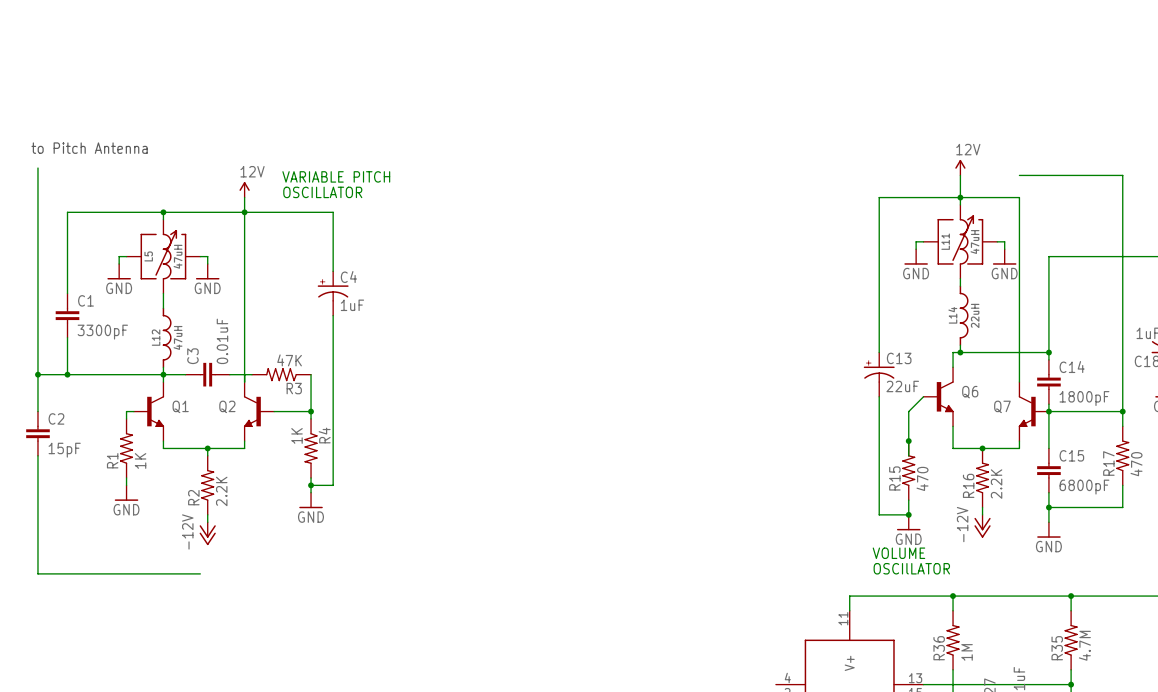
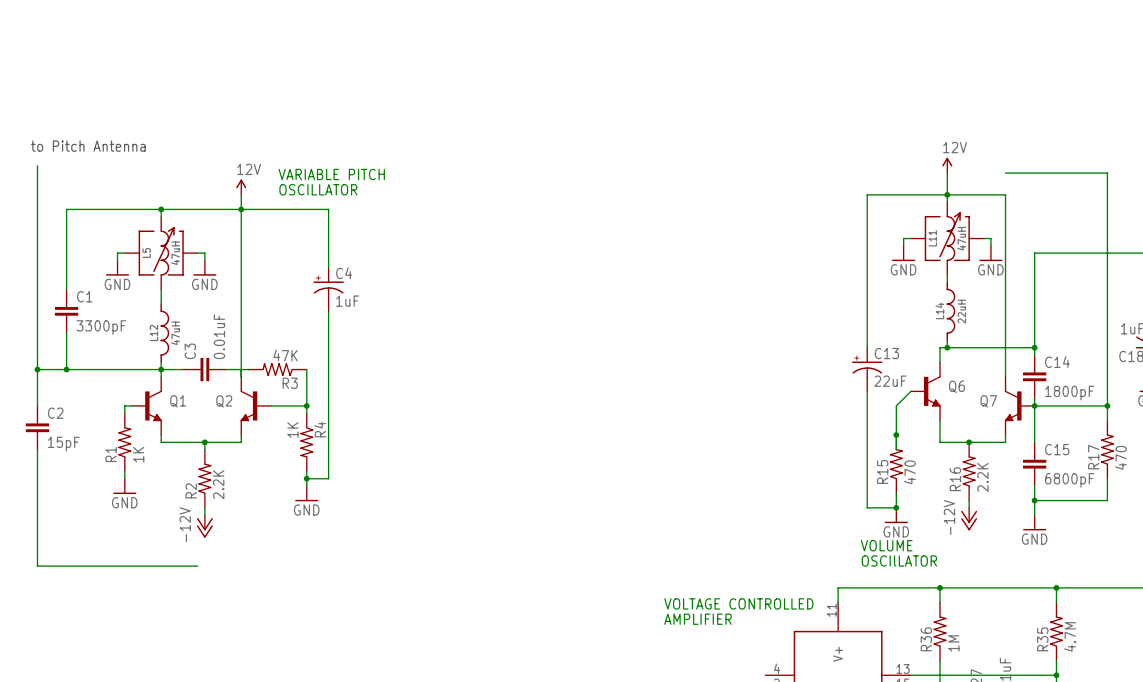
text: none -> VOLTAGE CONTROLLED (738, 603)
text: none -> AMPLIFIER (698, 619)

